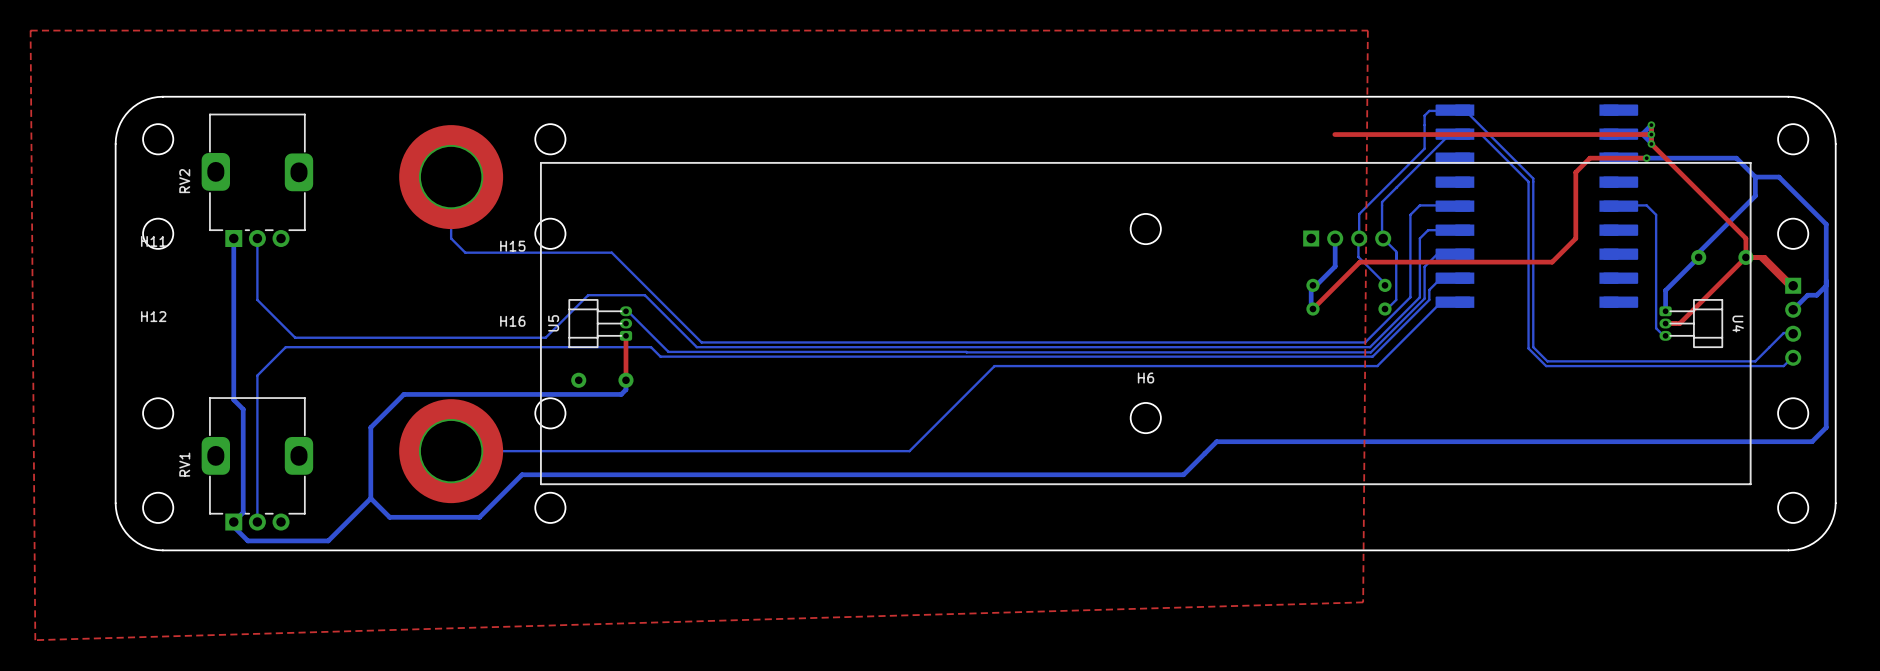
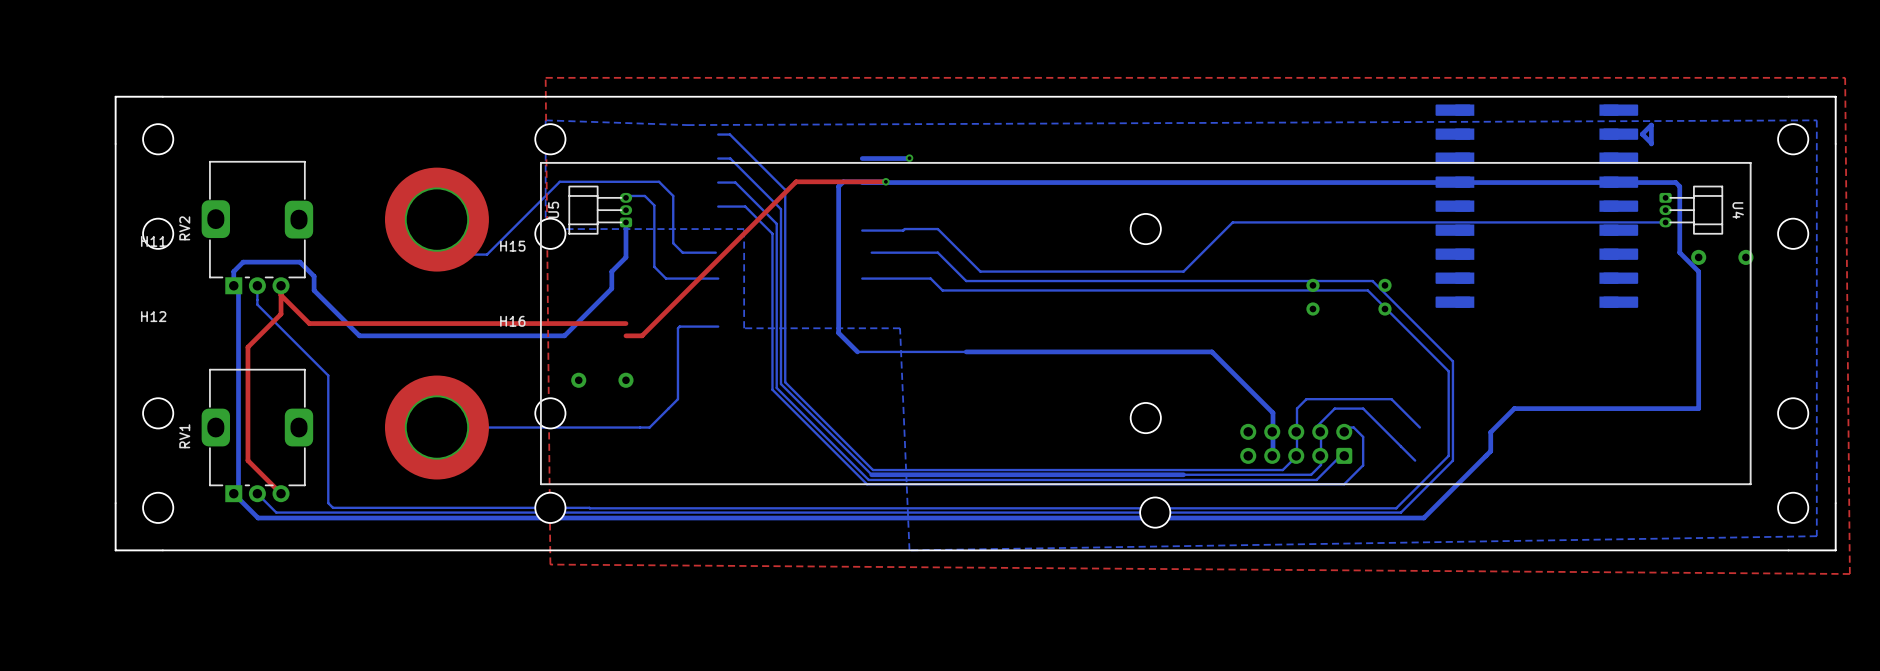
top zone outline: (30, 30) (35, 640) (1363, 602) (1367, 30) (30, 30) -> none
top zone outline: none -> (545, 77) (550, 564) (1849, 574) (1845, 77) (545, 77)
board edge: (162, 96) (142, 101) (129, 110) (118, 128) (115, 143) -> (162, 96) (115, 96) (115, 143)
board edge: (1788, 96) (1804, 99) (1821, 110) (1833, 128) (1835, 143) -> (1788, 96) (1835, 96) (1835, 143)
bottom track: (1452, 110) (1429, 110) (1424, 115) (1424, 148) (1359, 214) (1359, 238) -> none
bottom track: (1464, 110) (1533, 178) (1533, 347) (1547, 361) (1755, 361) (1783, 333) (1793, 333) -> none
bottom zone outline: none -> (545, 120) (545, 229) (744, 229) (744, 328) (900, 328) (909, 550) (1816, 536) (1816, 120) (687, 125) (545, 120)
top track: (1651, 125) (1651, 143) (1745, 238) (1745, 257) -> none
via: (1651, 125) -> none
bottom track: none -> (718, 134) (729, 134) (785, 189) (785, 382) (873, 470) (1282, 470) (1297, 455) (1297, 408) (1306, 399) (1391, 399) (1419, 427)
top track: (1334, 134) (1651, 134) -> none
via: (1651, 134) -> none
via: (1651, 143) -> none
bottom track: none -> (909, 158) (862, 158)
via: none -> (909, 158)
bottom track: (1608, 158) (1736, 158) (1755, 177) -> none
top track: (1646, 158) (1589, 158) (1575, 172) (1575, 238) (1552, 262) (1359, 262) (1312, 309) -> none
via: (1646, 158) -> none
bottom track: (451, 177) (451, 238) (465, 252) (611, 252) (701, 342) (1365, 342) (1410, 297) (1410, 214) (1419, 205) (1464, 206) -> none
part position: (451, 177) -> (436, 219)
bottom track: (1755, 177) (1779, 177) (1826, 224) (1826, 427) (1812, 441) (1216, 441) (1183, 474) -> (1321, 427) (1321, 464) (1311, 474) (1183, 474)
bottom track: (1755, 177) (1755, 195) (1698, 252) (1698, 257) (1665, 290) (1665, 311) -> none
RV2 position: (257, 180) -> (257, 227)
top track: none -> (885, 181) (796, 181) (642, 335) (625, 335)
via: none -> (885, 181)
bottom track: none -> (718, 182) (735, 182) (776, 223) (776, 387) (868, 479) (1316, 479) (1345, 451)
bottom track: none -> (625, 195) (644, 195) (654, 205) (654, 266) (666, 278) (718, 278)
bottom track: (1623, 205) (1646, 205) (1656, 214) (1656, 328) (1665, 335) -> none
bottom track: none -> (718, 206) (745, 206) (772, 233) (772, 389) (866, 484) (1344, 484) (1363, 465) (1363, 436) (1353, 427) (1345, 427)
bottom track: none -> (436, 219) (471, 254) (487, 254) (559, 181) (659, 181) (673, 195) (673, 243) (682, 252) (715, 252)
bottom track: none -> (1665, 222) (1232, 222) (1183, 271) (980, 271) (937, 229) (862, 230)
bottom track: (1464, 230) (1428, 230) (1419, 238) (1419, 297) (1370, 347) (696, 347) (644, 295) (588, 295) (545, 337) (295, 337) (257, 299) -> (862, 278) (930, 278) (942, 290) (1367, 290) (1448, 371) (1448, 455) (1396, 508) (333, 507) (328, 503) (328, 375) (257, 304) (257, 299)
bottom track: (233, 238) (233, 271) -> (625, 222) (625, 257) (611, 271) (611, 288) (564, 335) (359, 335) (314, 290) (314, 276) (299, 262) (243, 262) (233, 271)
bottom track: (257, 238) (257, 285) -> none
bottom track: (1335, 238) (1335, 266) (1315, 285) (1311, 285) (1311, 309) -> none
part: (1347, 238) -> none
bottom track: (1358, 238) (1358, 257) (1386, 285) -> none
bottom track: (1383, 238) (1396, 251) (1396, 299) (1386, 309) -> none
bottom track: (1382, 242) (1382, 202) (1449, 134) (1480, 134) (1528, 181) (1528, 348) (1546, 366) (1783, 366) (1793, 356) -> none
bottom track: none -> (871, 252) (937, 252) (966, 281) (1372, 281) (1452, 361) (1452, 460) (1400, 512) (276, 512) (257, 493)
bottom track: (1457, 252) (1438, 252) (1424, 266) (1424, 298) (1370, 352) (966, 351) -> (1273, 451) (1273, 412) (1211, 351) (966, 351)
top track: (1745, 257) (1679, 323) (1665, 323) -> none
top track: (1745, 257) (1764, 257) (1793, 285) (1788, 285) (1760, 257) -> none
bottom track: (1462, 276) (1442, 276) (1429, 289) (1429, 299) (1372, 356) (660, 356) (651, 347) (285, 347) (257, 375) (257, 522) -> none
bottom track: (233, 285) (233, 399) (243, 409) (243, 512) (233, 522) -> (233, 285) (238, 290) (238, 488) (233, 493) (258, 518) (1423, 518) (1490, 451) (1490, 432) (1514, 408) (1698, 408) (1698, 271) (1679, 252) (1679, 186) (1675, 182) (862, 182)
top track: none -> (281, 285) (281, 314) (247, 347) (247, 460) (281, 493)
bottom track: (1826, 285) (1816, 295) (1807, 295) (1793, 309) -> none
top track: none -> (281, 295) (309, 323) (625, 323)
bottom track: (1462, 304) (1438, 304) (1377, 366) (994, 366) (909, 451) (451, 451) -> none
bottom track: (625, 311) (668, 351) (857, 351) -> (885, 181) (843, 181) (838, 186) (838, 333) (857, 351)
part: (1793, 321) -> none
U5 position: (600, 323) -> (600, 210)
U4 position: (1691, 323) -> (1691, 210)
bottom track: none -> (718, 326) (679, 326) (677, 328) (677, 399) (649, 427) (436, 427)
top track: (625, 337) (625, 380) -> none
bottom track: (625, 375) (625, 389) (621, 394) (403, 394) (370, 427) (370, 498) -> none
H6 name: H6 (1146, 378) -> none
bottom track: none -> (1315, 427) (1334, 408) (1363, 408) (1415, 460)
part: none -> (1296, 443)
part position: (451, 451) -> (436, 427)
RV1 position: (257, 464) -> (257, 435)
bottom track: (871, 474) (522, 474) (479, 517) (389, 517) (370, 498) -> (871, 474) (780, 384) (780, 209) (730, 158) (718, 158)
bottom track: (370, 498) (328, 540) (247, 540) (233, 526) -> none
board edge: (115, 503) (120, 523) (129, 536) (142, 545) (162, 550) -> (115, 503) (115, 550) (162, 550)
board edge: (1835, 503) (1831, 523) (1821, 536) (1808, 545) (1788, 550) -> (1835, 503) (1835, 550) (1788, 550)
part: none -> (1155, 512)

